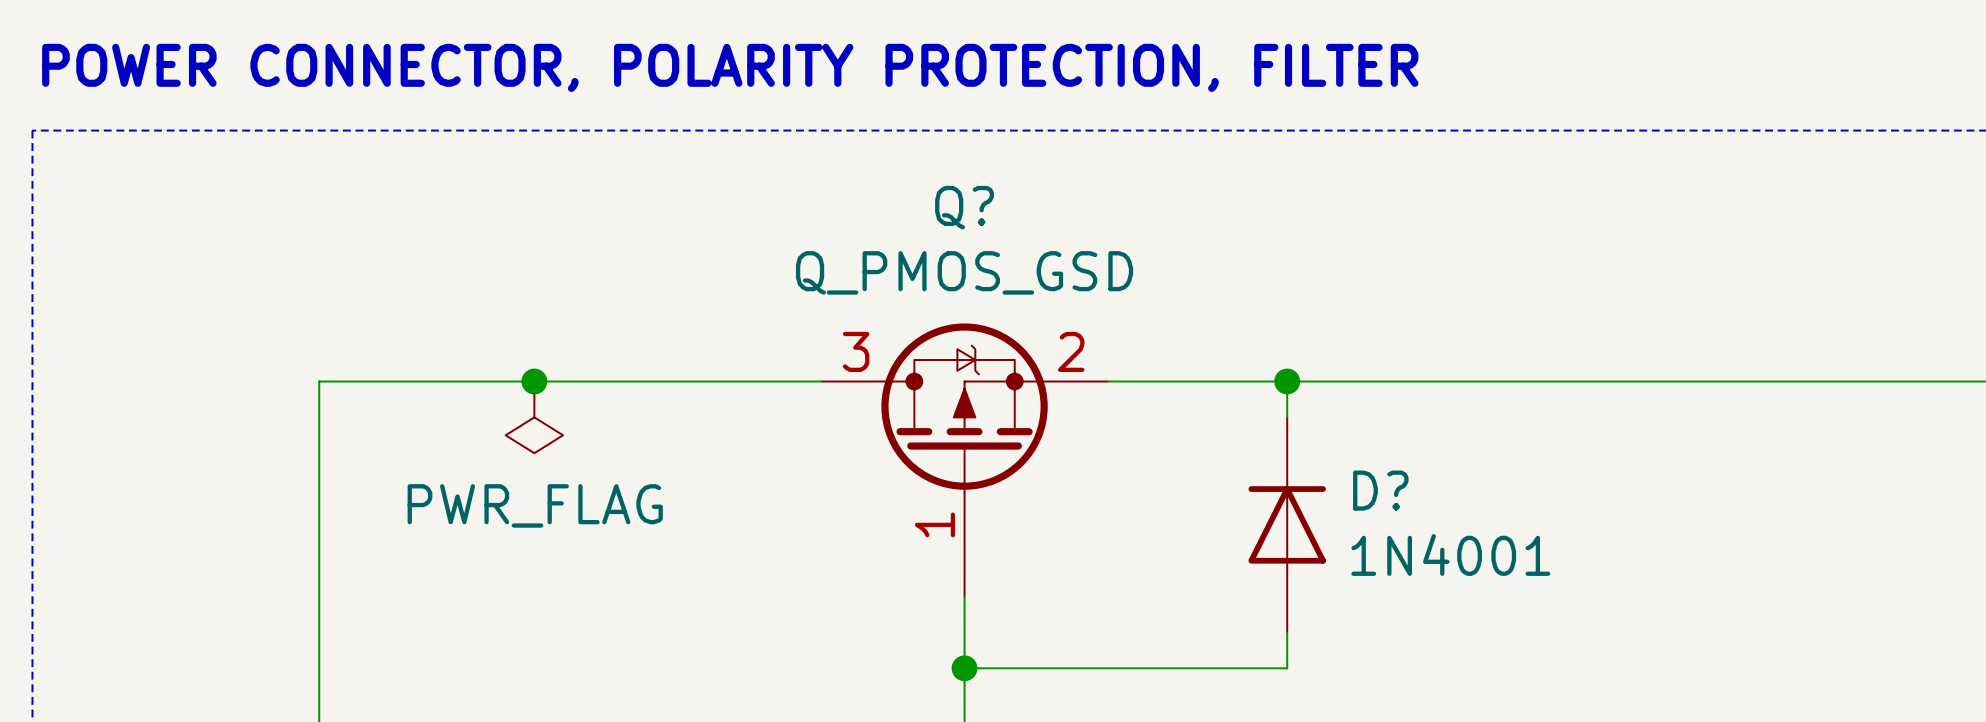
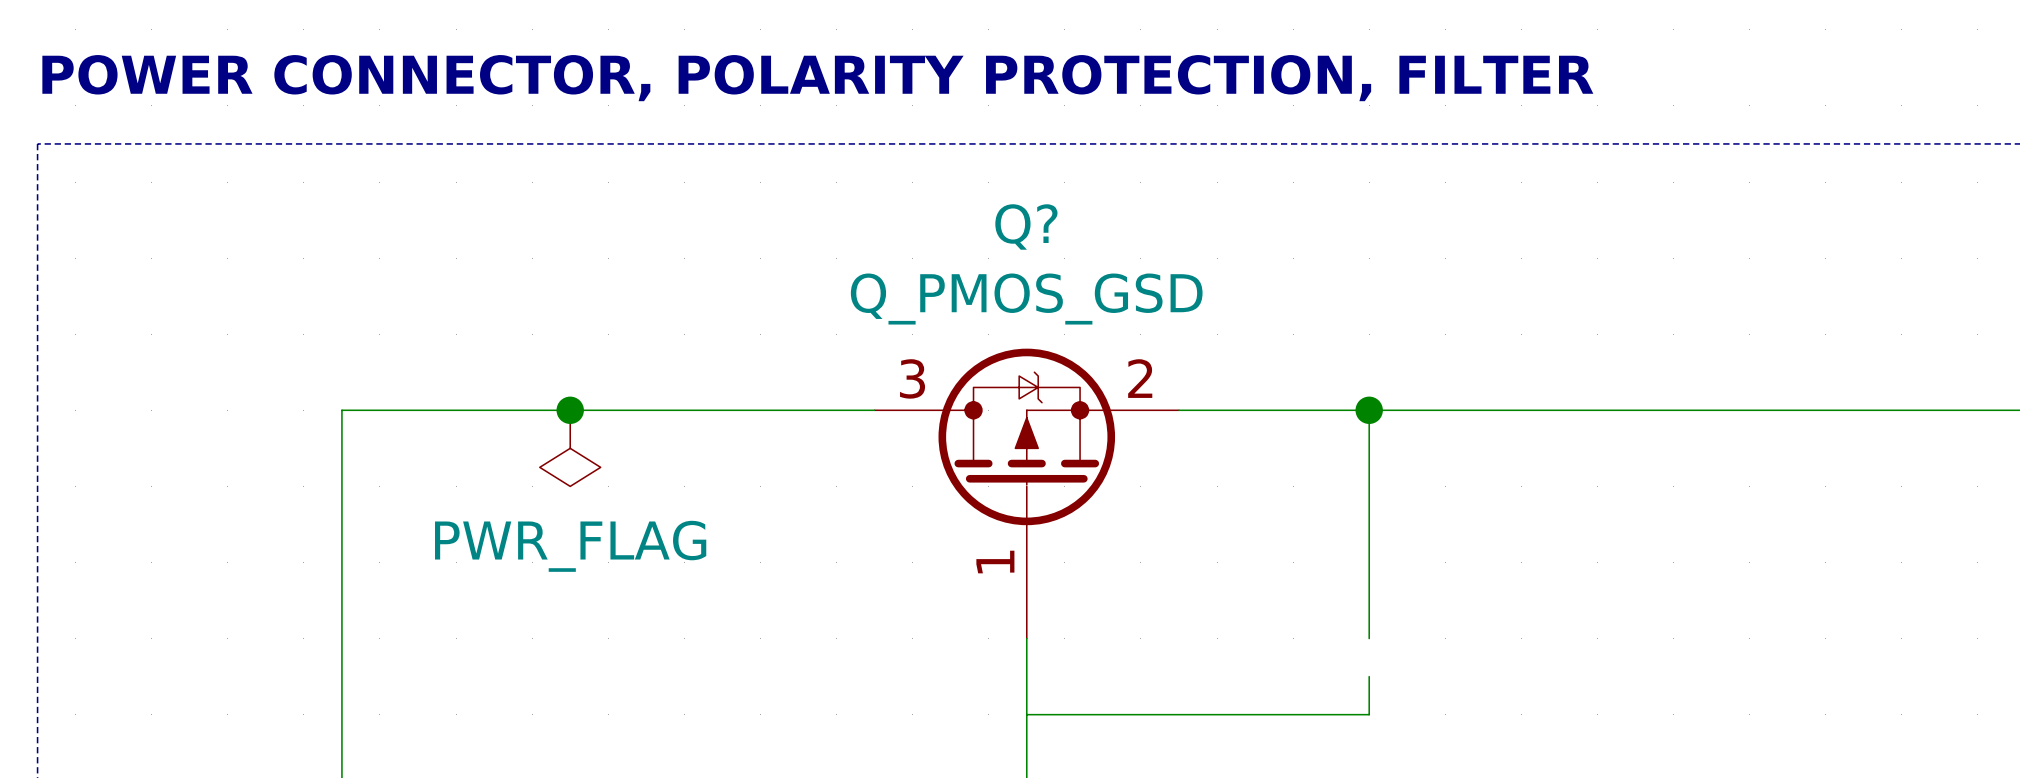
D?: 1N4001 (1287, 524) -> none
junction: (964, 668) -> none

